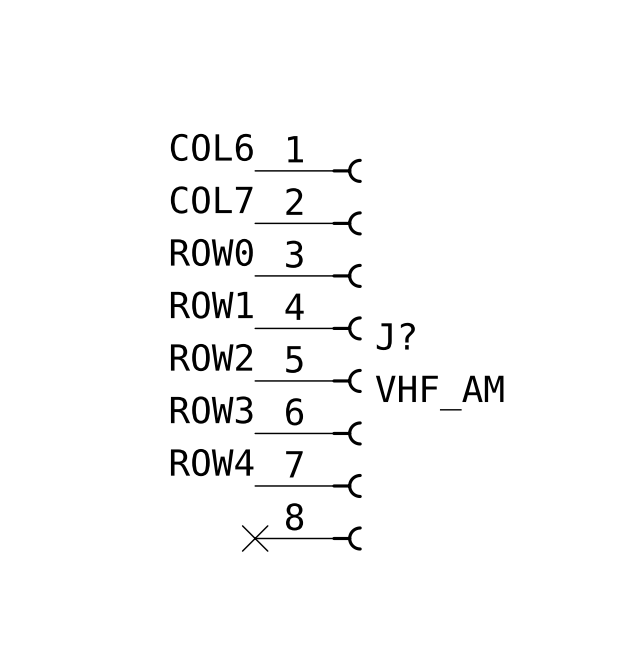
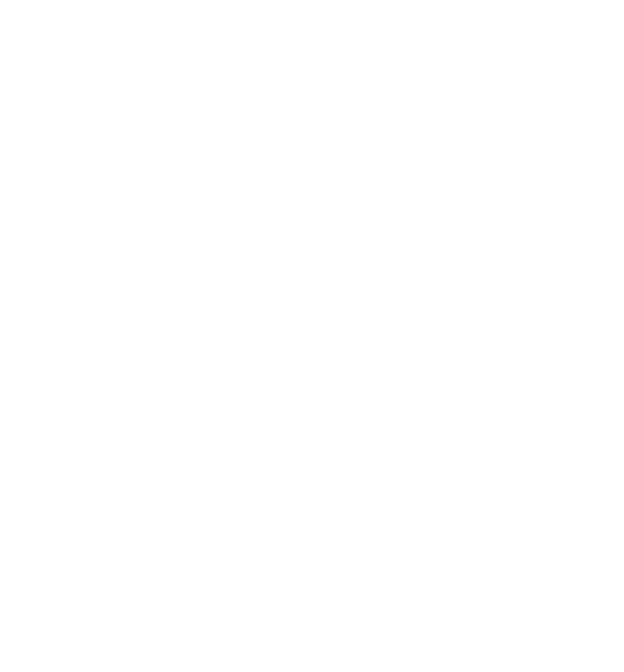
label: COL6 (211, 147) -> none
label: COL7 (211, 199) -> none
label: ROW0 (211, 252) -> none
label: ROW1 (211, 305) -> none
J?: VHF_AM (308, 354) -> none
label: ROW2 (211, 357) -> none
label: ROW3 (211, 410) -> none
label: ROW4 (212, 462) -> none
no-connect mark: (255, 538) -> none

